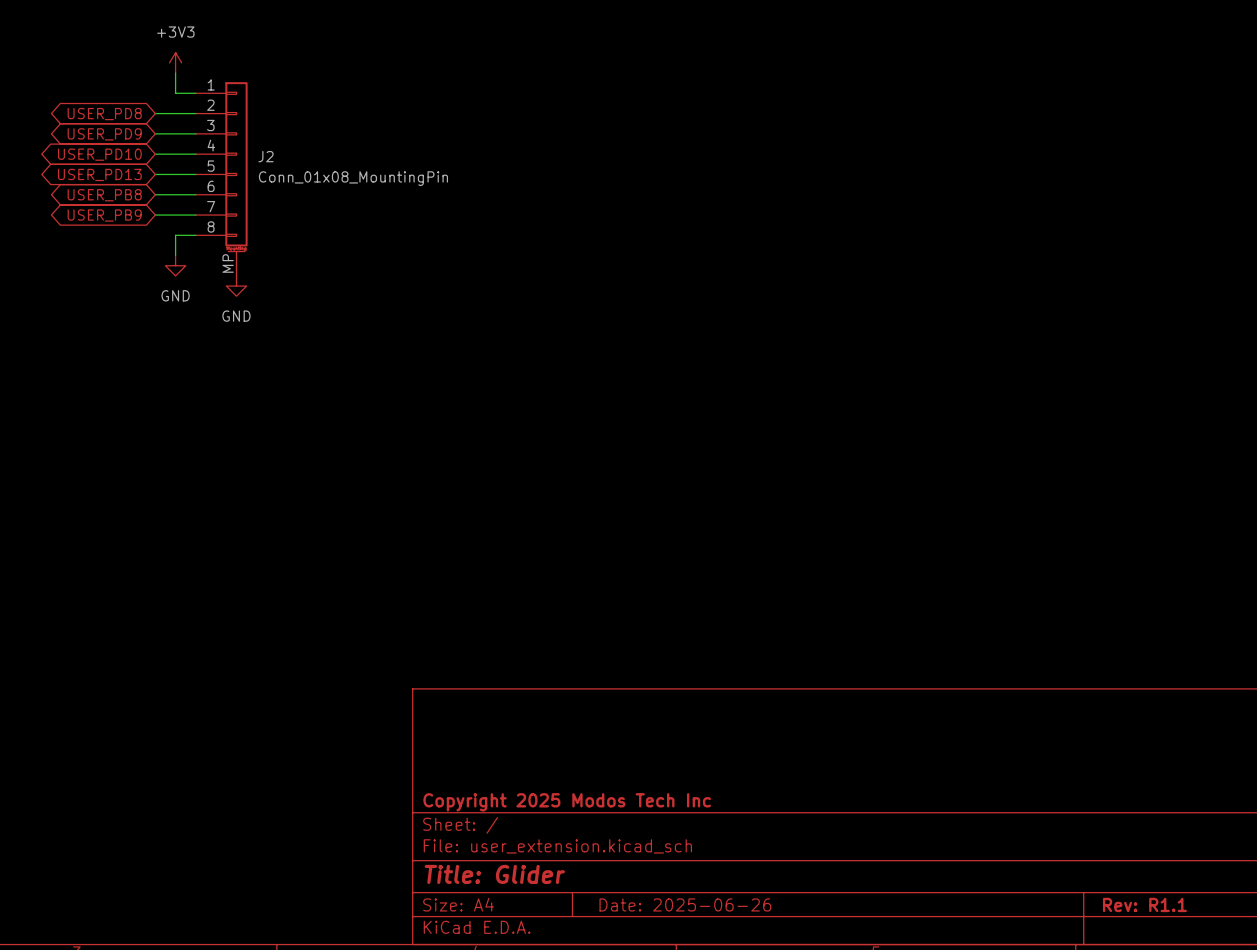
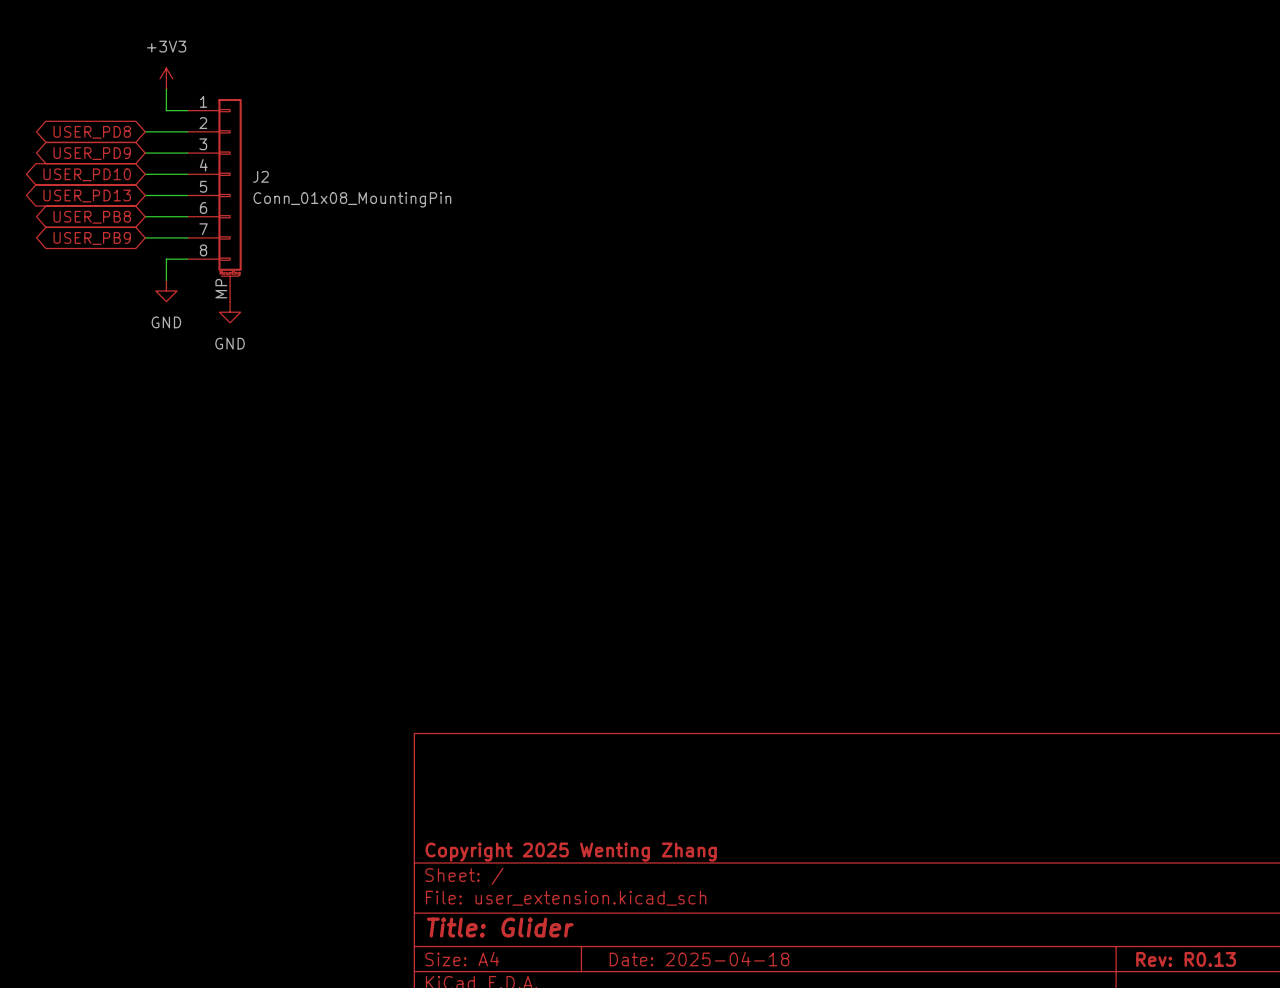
title block: Copyright 2025 Modos Tech Inc (567, 802) -> Copyright 2025 Wenting Zhang (571, 852)
title block: Date: 2025-06-26 (685, 904) -> Date: 2025-04-18 (699, 959)
title block: Rev: R1.1 (1144, 904) -> Rev: R0.13 (1186, 959)

